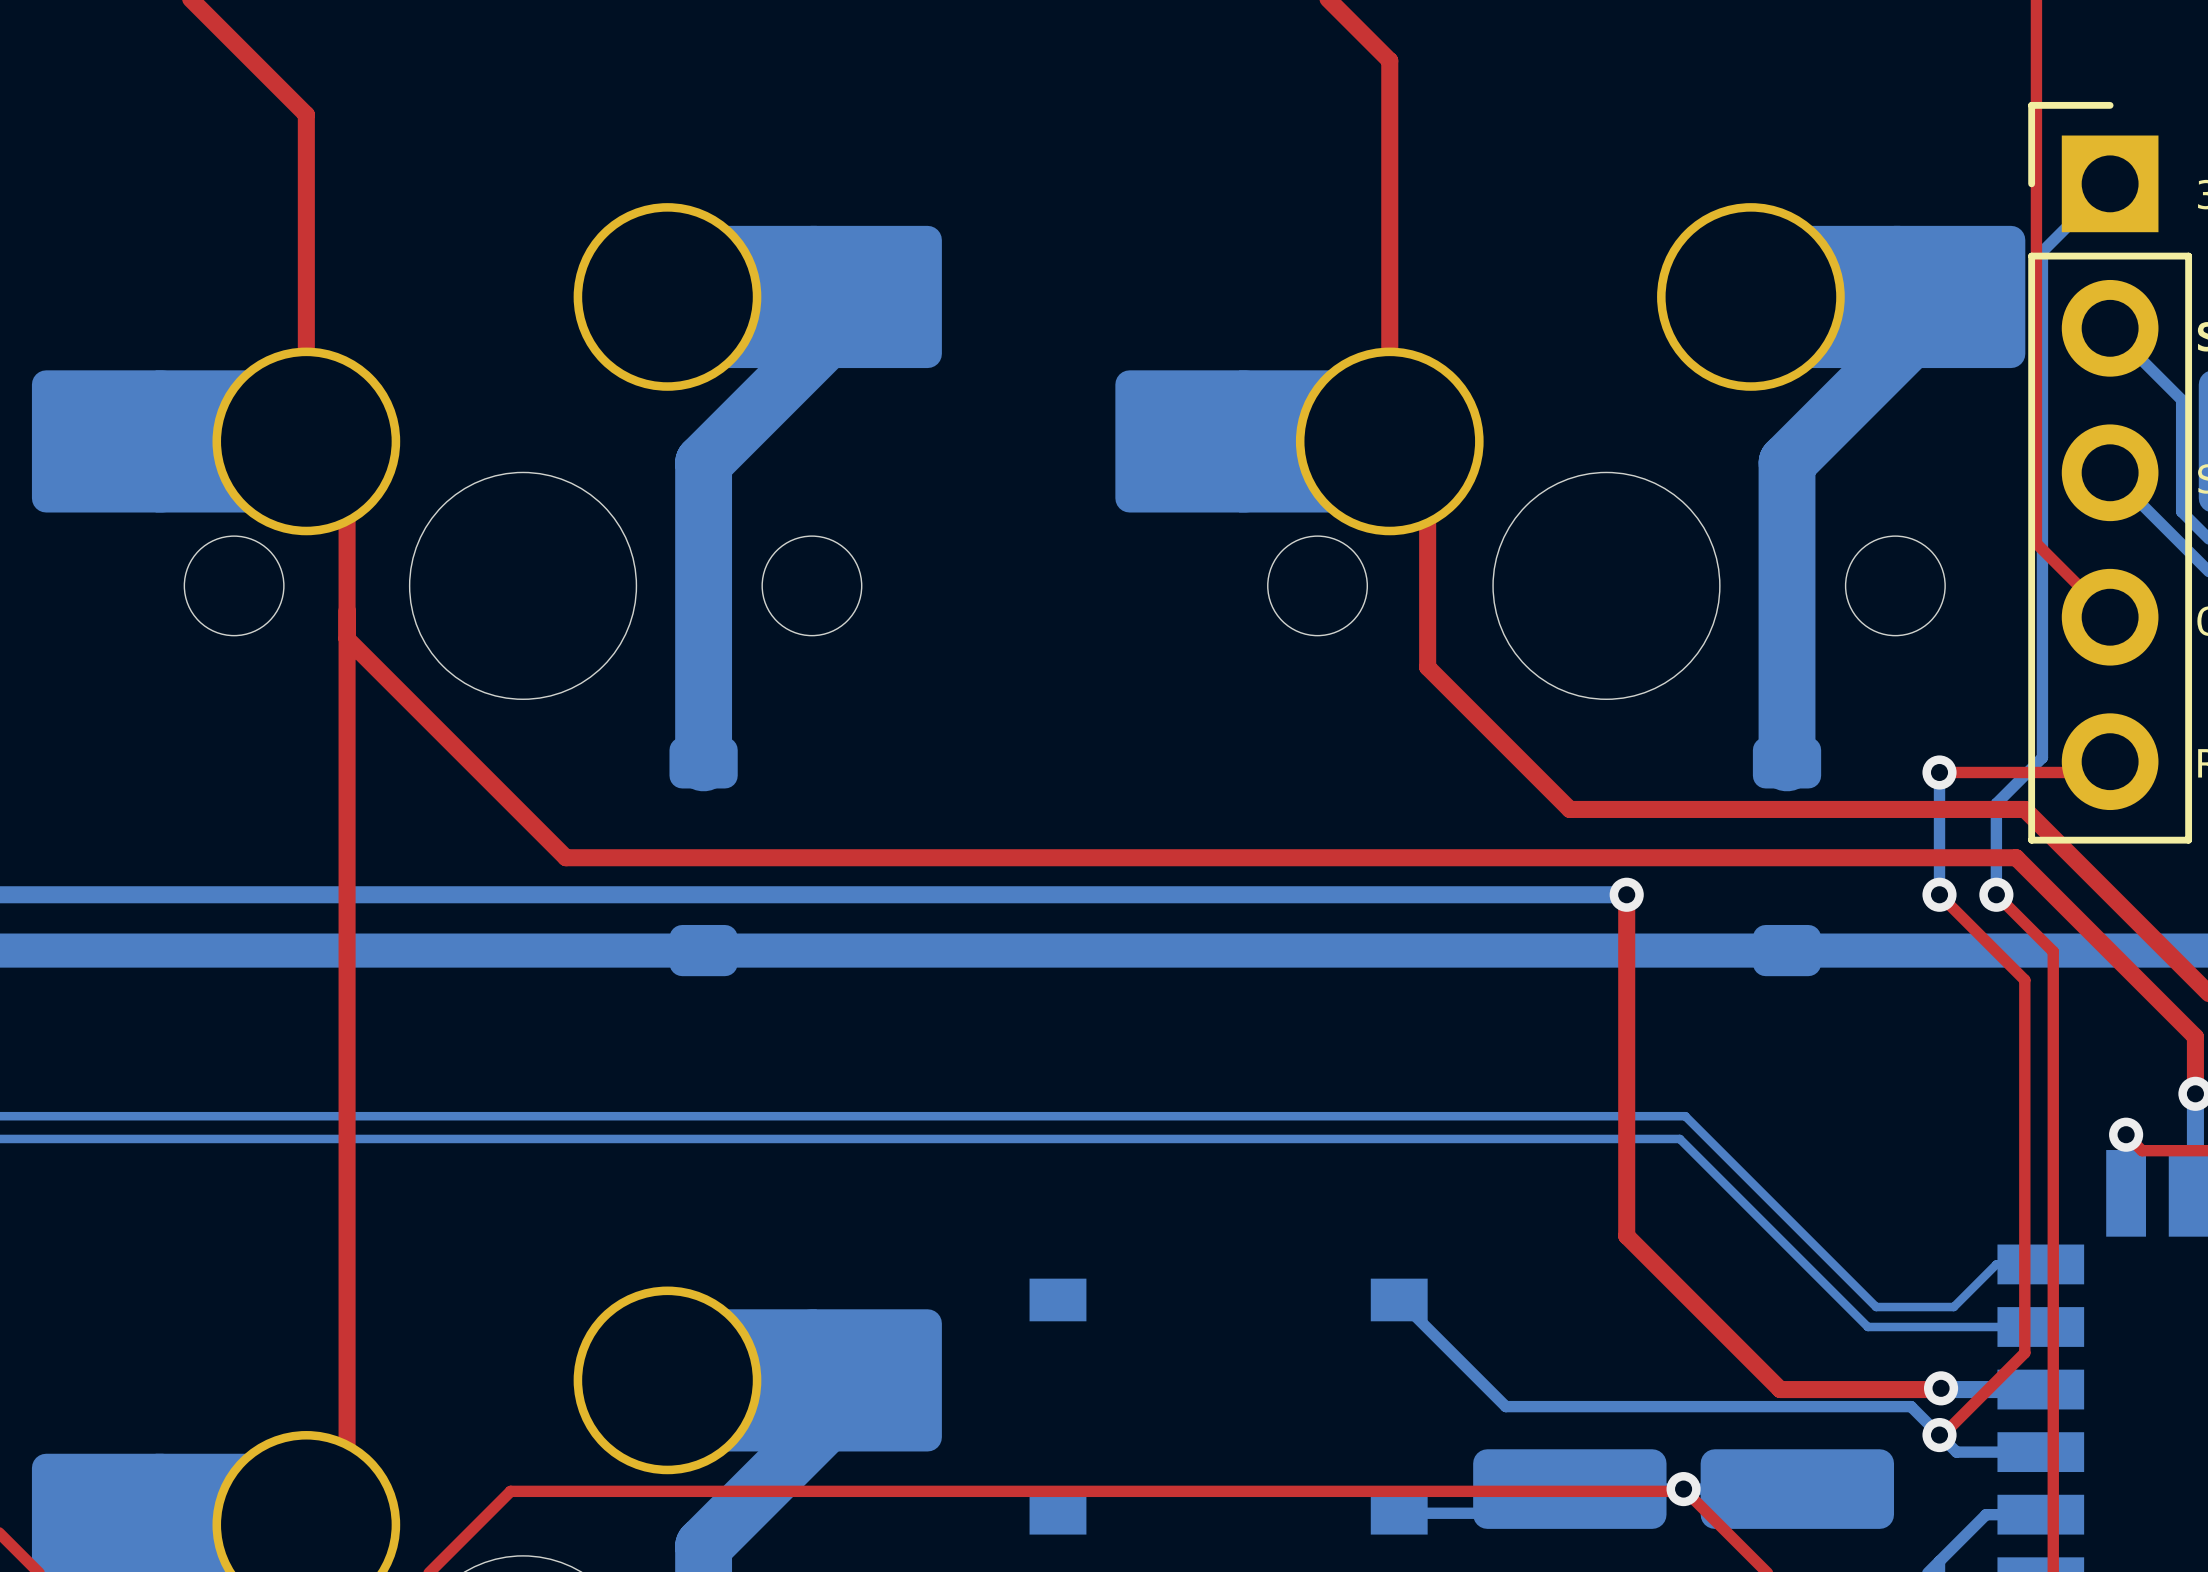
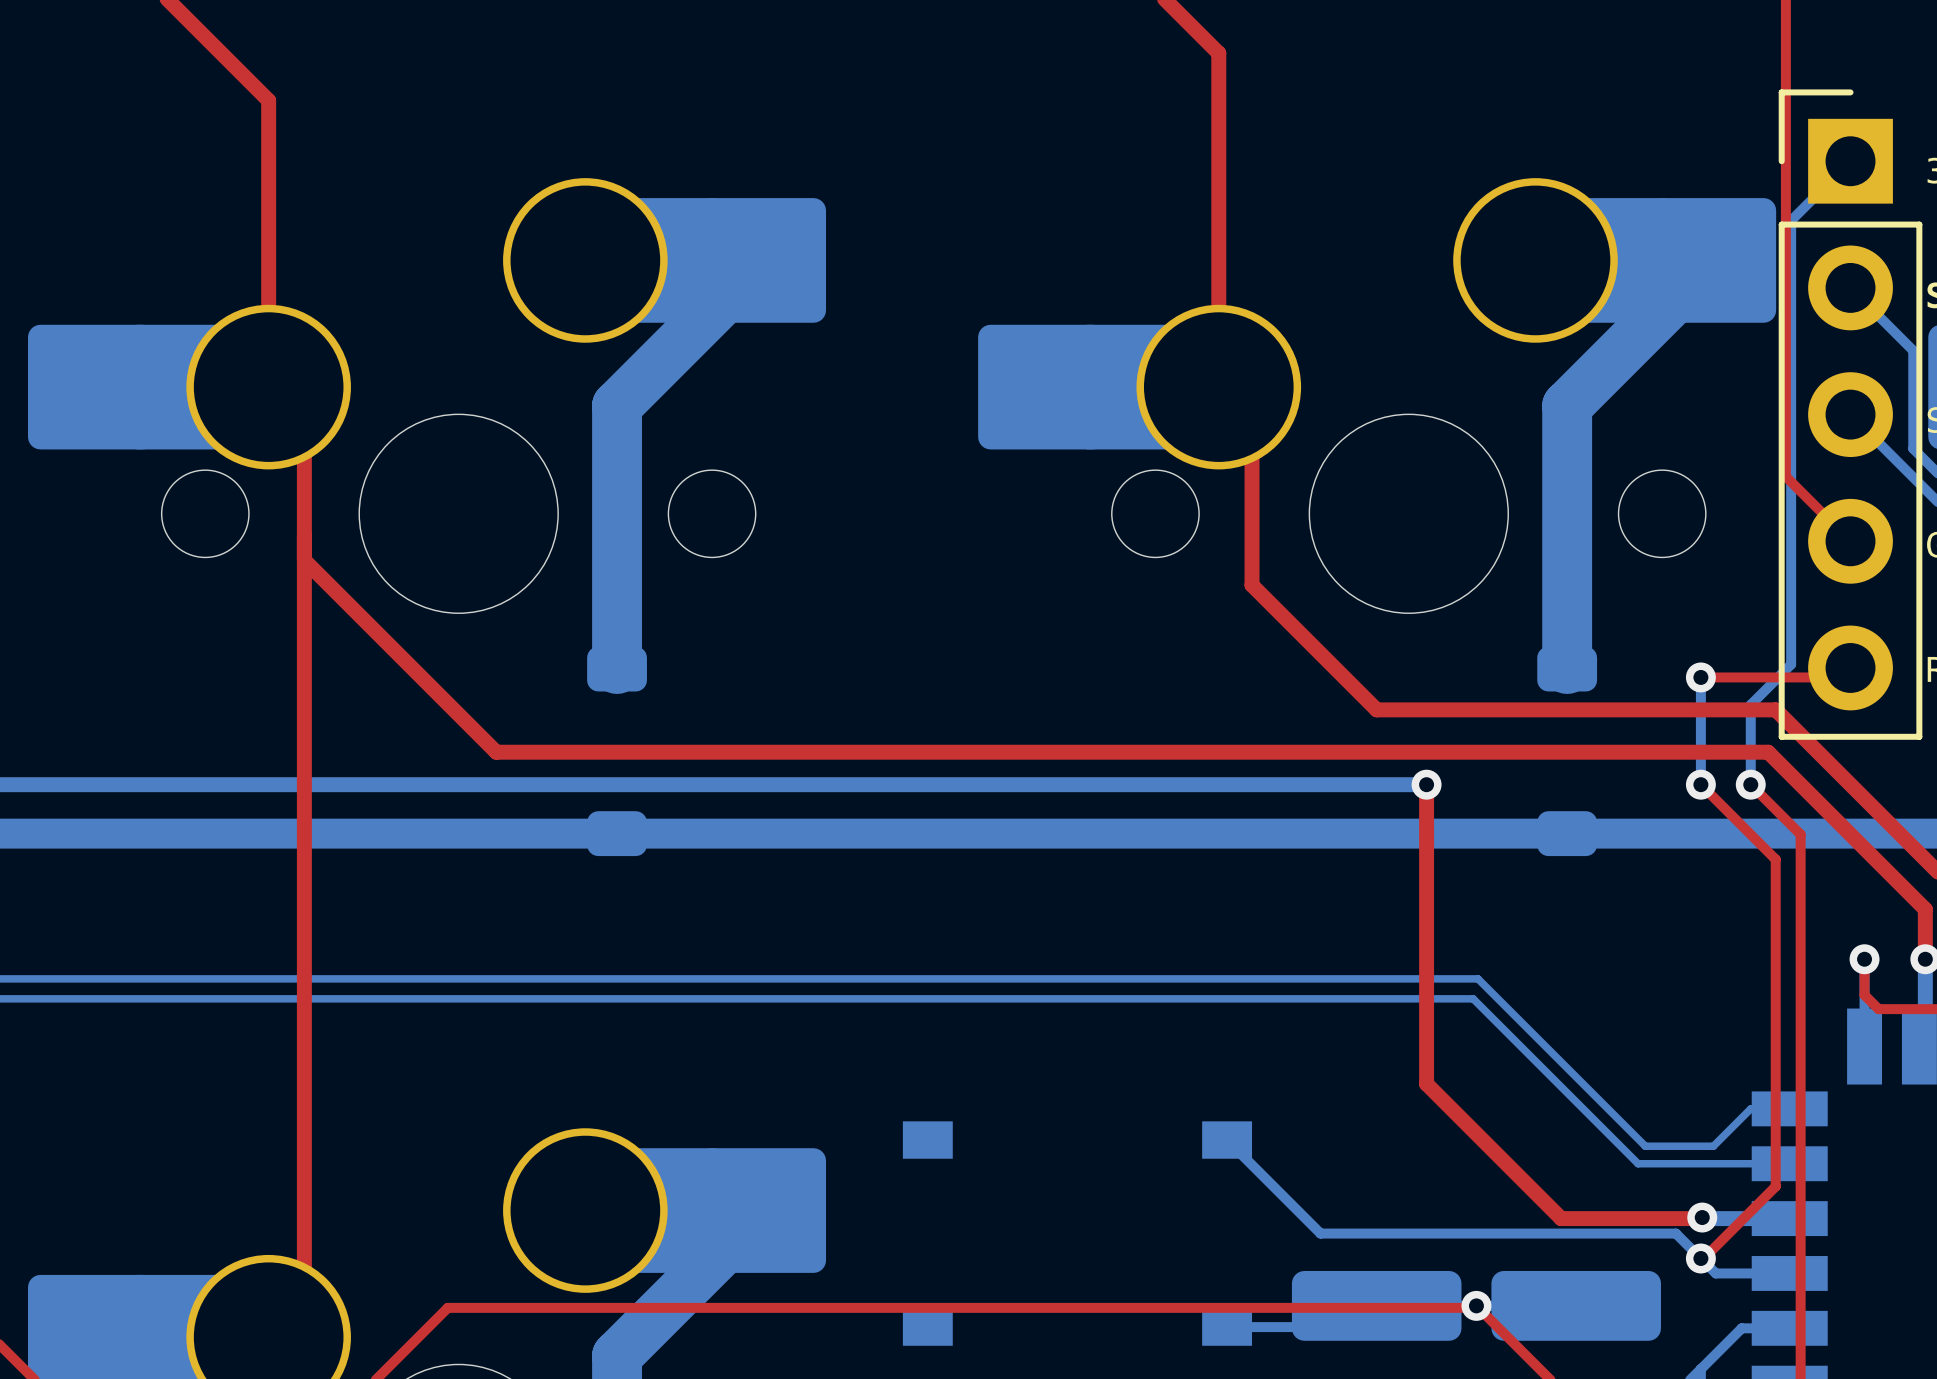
top track: none -> (1864, 959) (1864, 995)
via position: (2126, 1134) -> (1864, 959)

